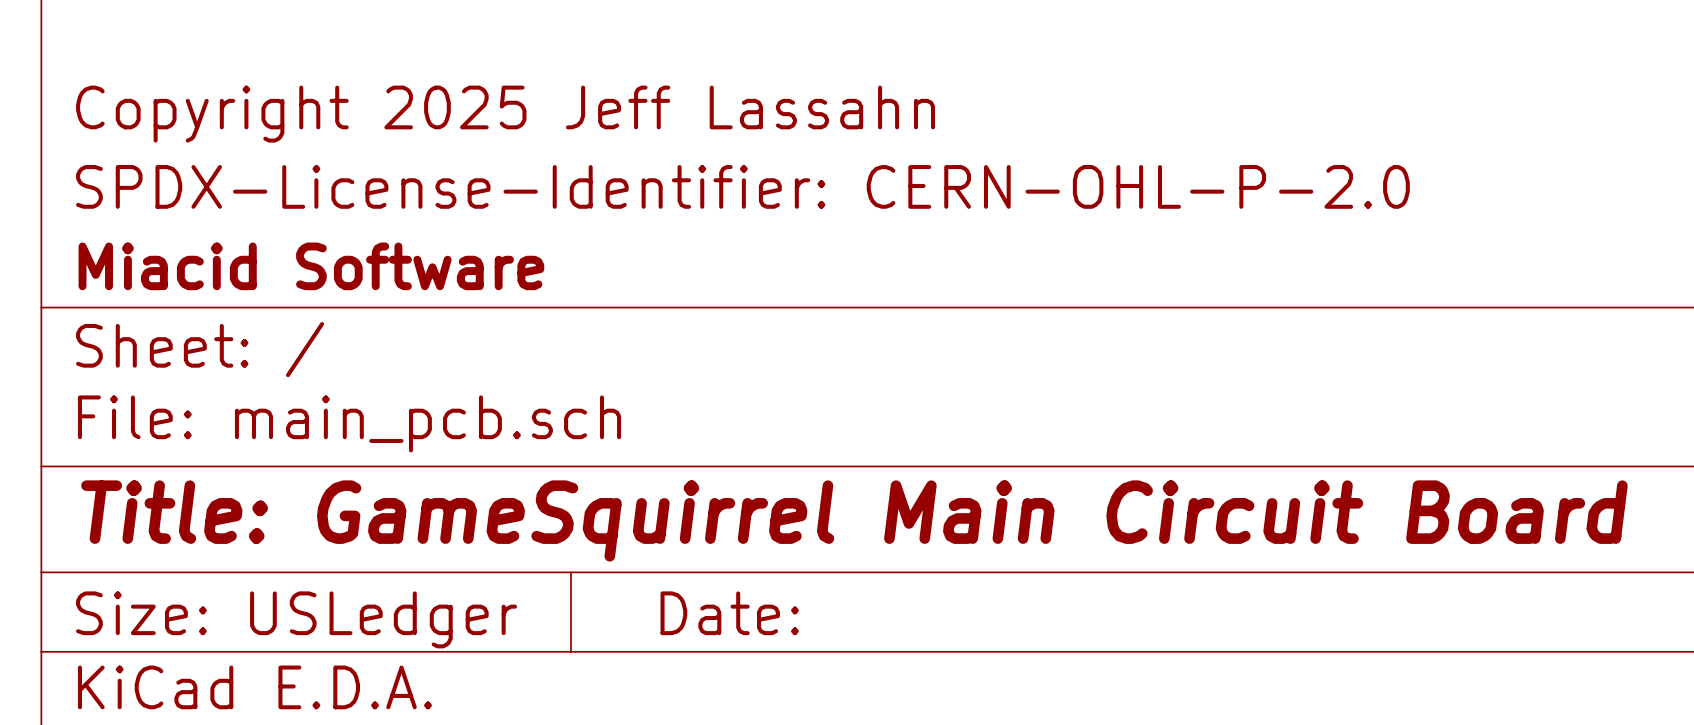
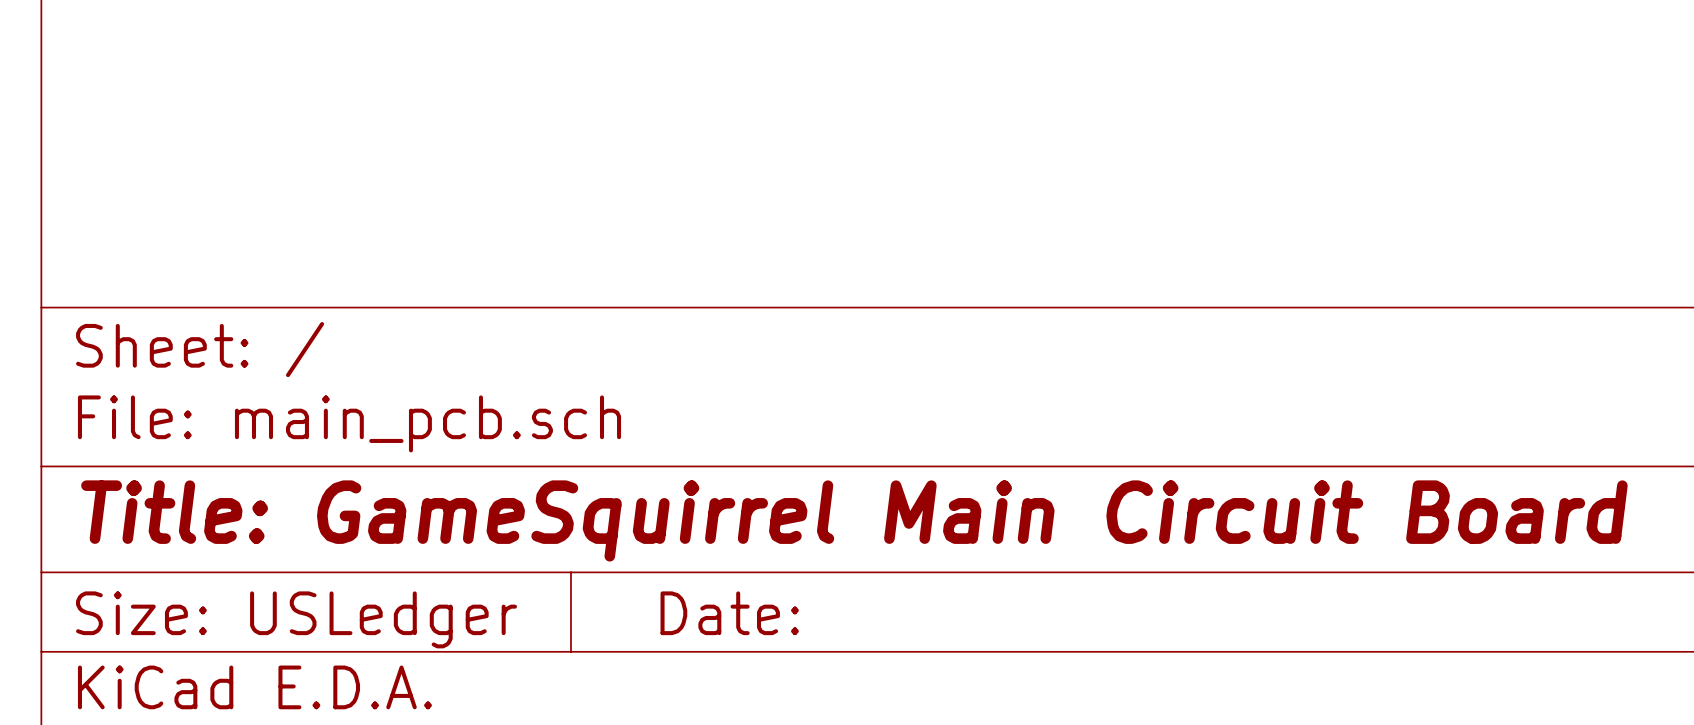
title block: Copyright 2025 Jeff Lassahn (505, 114) -> none
title block: SPDX-License-Identifier: CERN-OHL-P-2.0 (742, 186) -> none
title block: Miacid Software (311, 266) -> none

